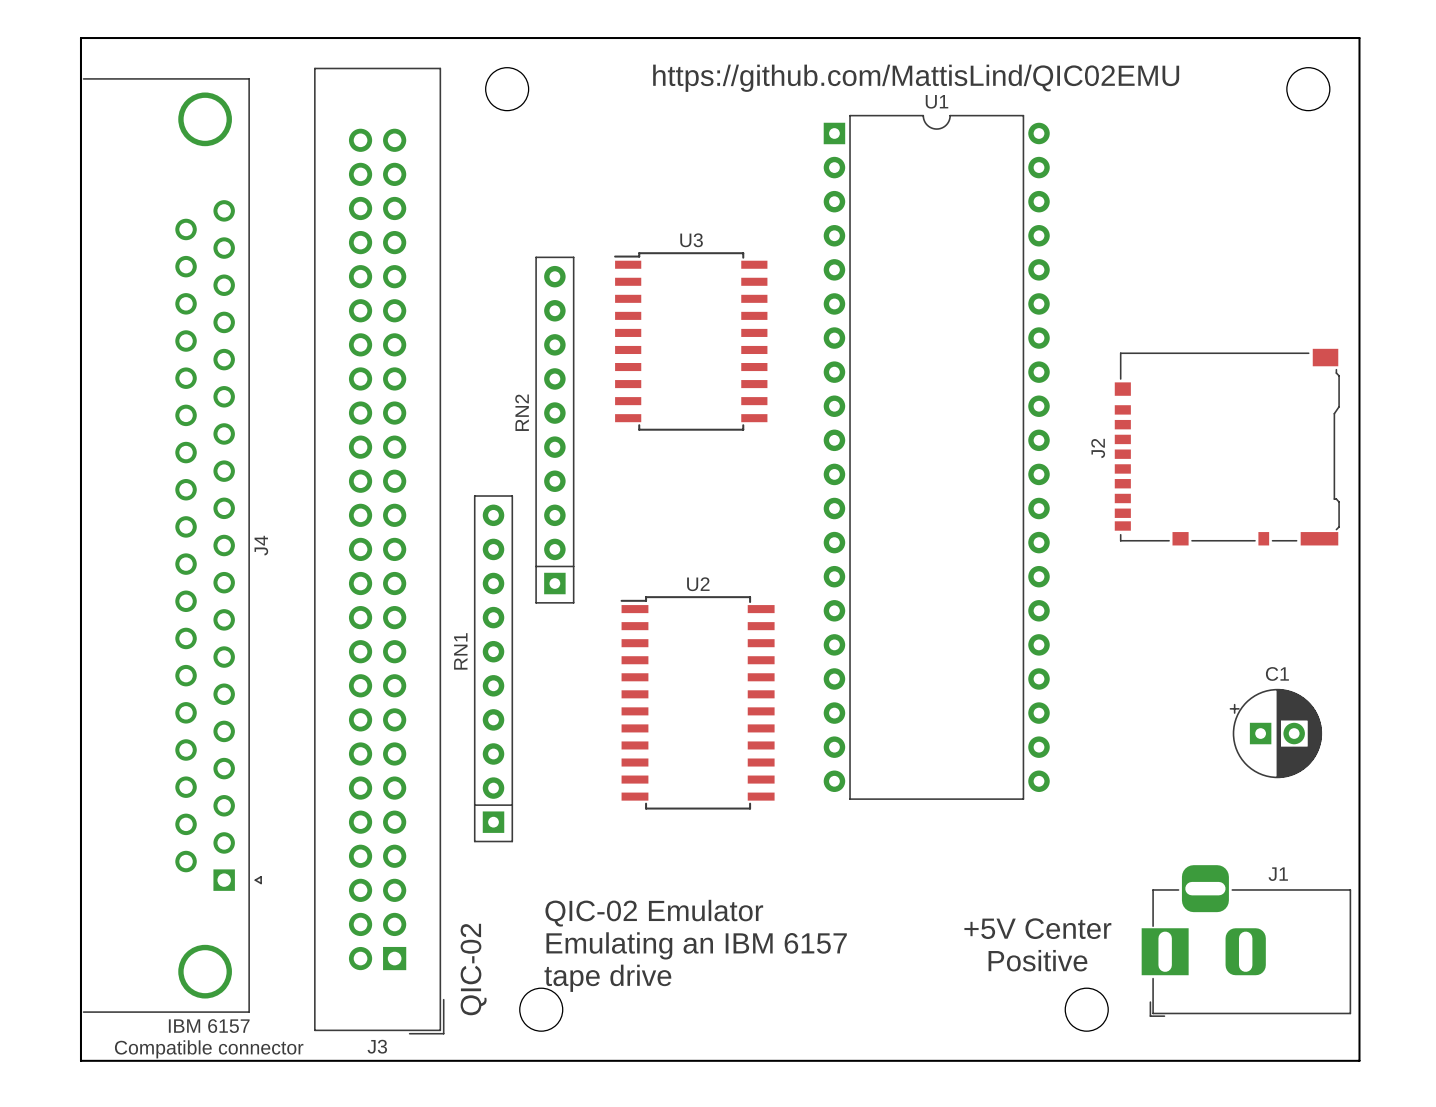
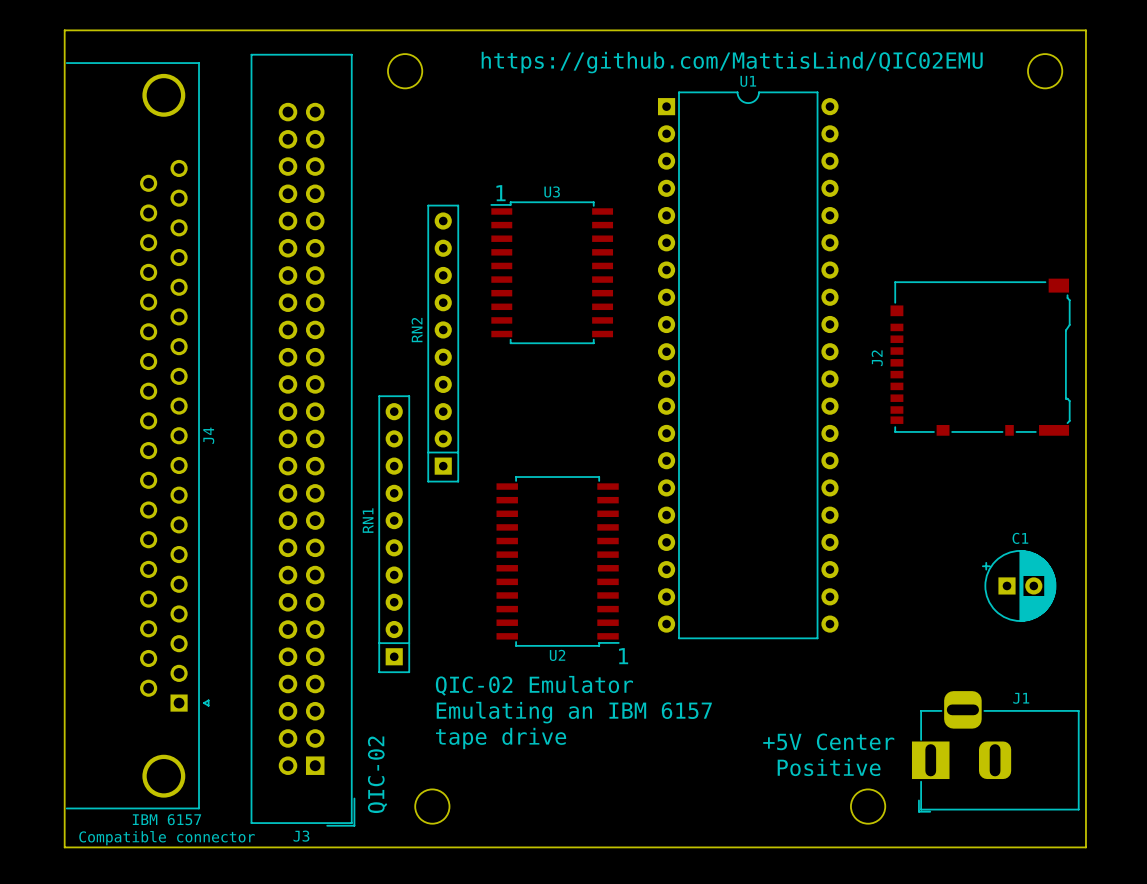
text: none -> 1 (501, 193)
U2 rotation: 0° (697, 702) -> 180° (558, 561)
text: none -> 1 (623, 656)
text position: QIC-02 Emulator (654, 913) -> QIC-02 Emulator (534, 685)
text position: Emulating an IBM 6157 (696, 945) -> Emulating an IBM 6157 (574, 712)
text position: tape drive (607, 978) -> tape drive (501, 738)

